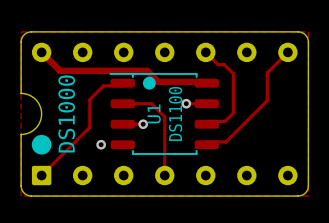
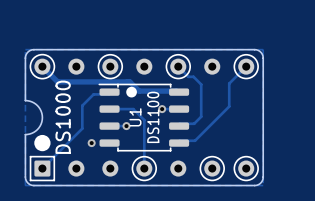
drawing: none -> [29, 53, 56, 80]
drawing: none -> [97, 53, 124, 80]
drawing: none -> [165, 53, 191, 80]
drawing: none -> [233, 53, 259, 80]
drawing: none -> [131, 155, 158, 182]
drawing: none -> [199, 155, 259, 182]
line: none -> (30, 156) (54, 156) (54, 180) (30, 180) (30, 156)

